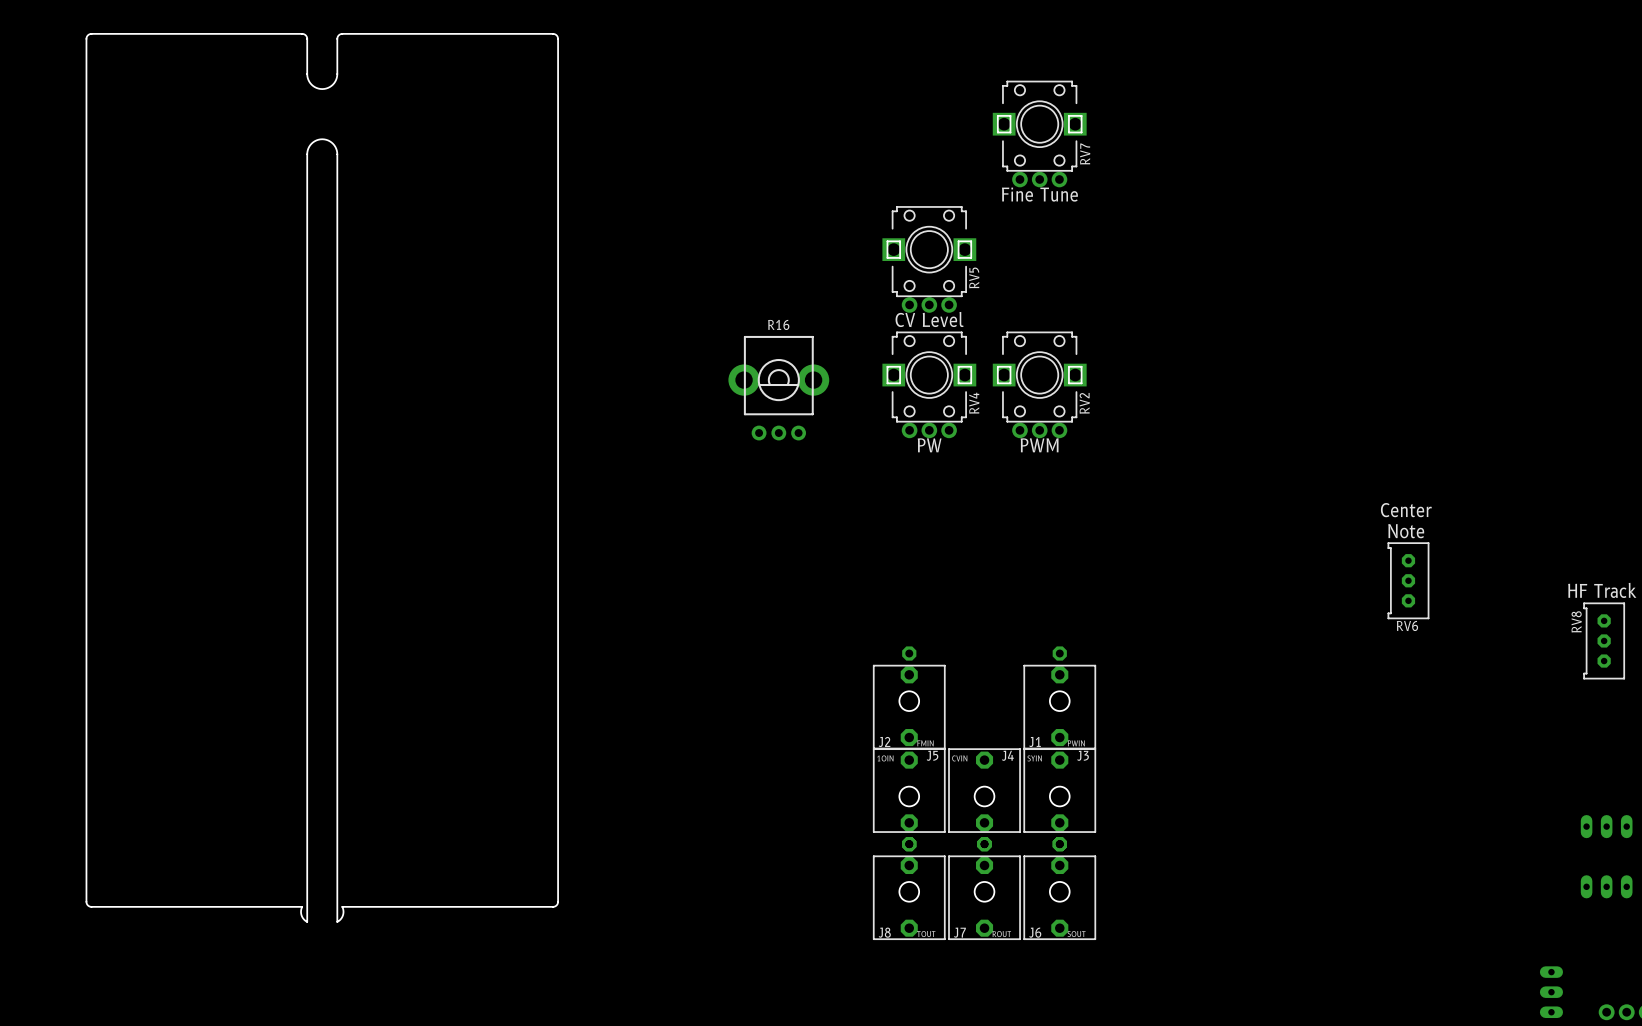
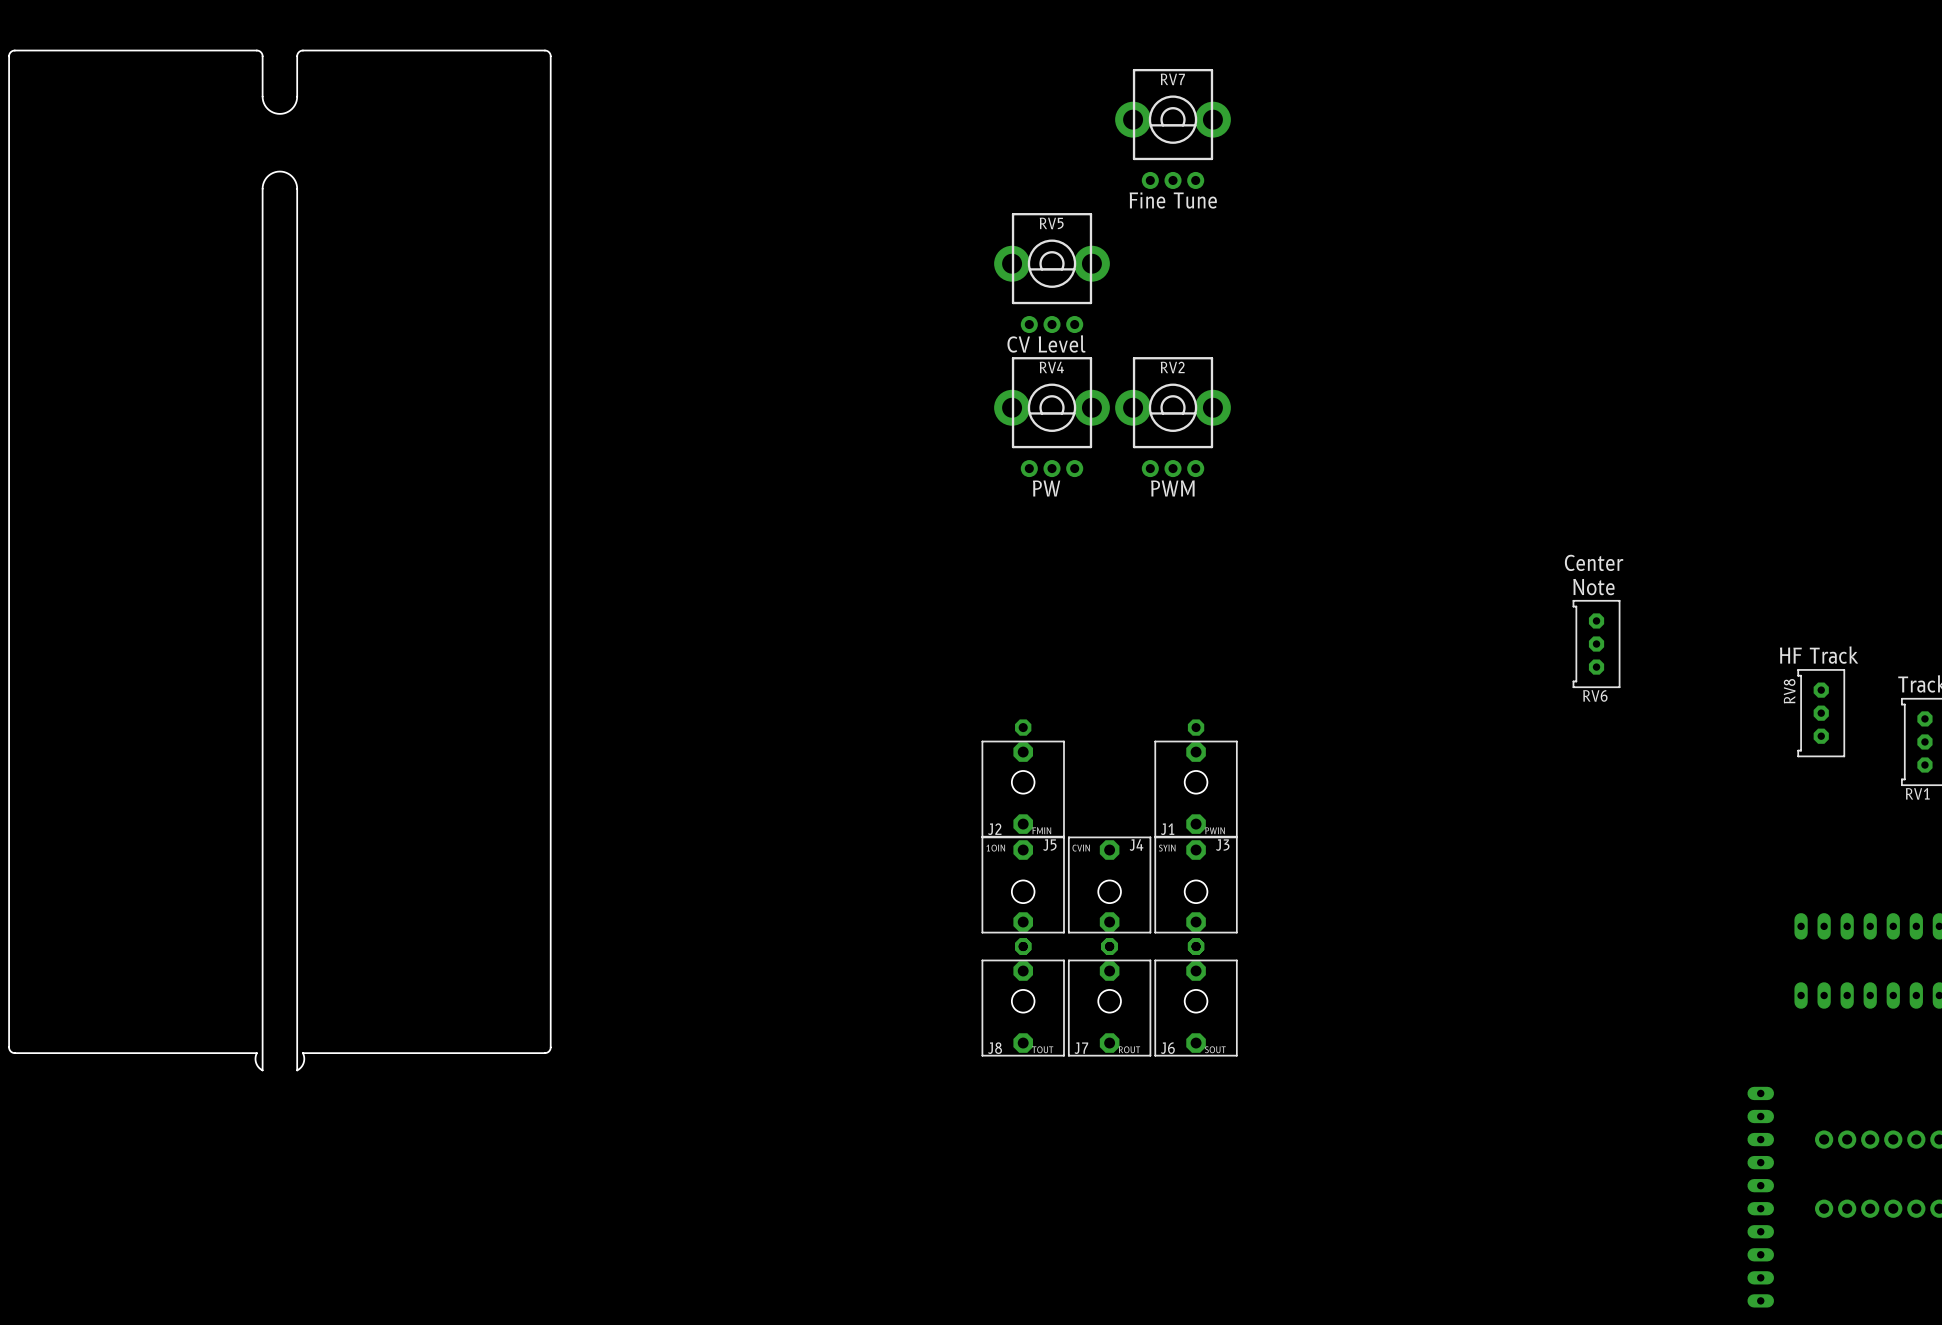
RV7 footprint: [992, 80, 1087, 188] -> [1115, 68, 1231, 189]
RV7 name position: RV7 (1085, 154) -> RV7 (1172, 79)
RV5 footprint: [882, 206, 977, 313] -> [994, 213, 1110, 334]
RV5 name position: RV5 (974, 277) -> RV5 (1051, 223)
RV4 footprint: [882, 331, 977, 439] -> [994, 357, 1110, 478]
RV2 footprint: [992, 331, 1087, 439] -> [1115, 357, 1231, 478]
R16: (778, 388) -> none
RV4 name position: RV4 (974, 403) -> RV4 (1051, 367)
RV2 name position: RV2 (1084, 403) -> RV2 (1172, 367)
drawing position: (322, 477) -> (279, 560)

